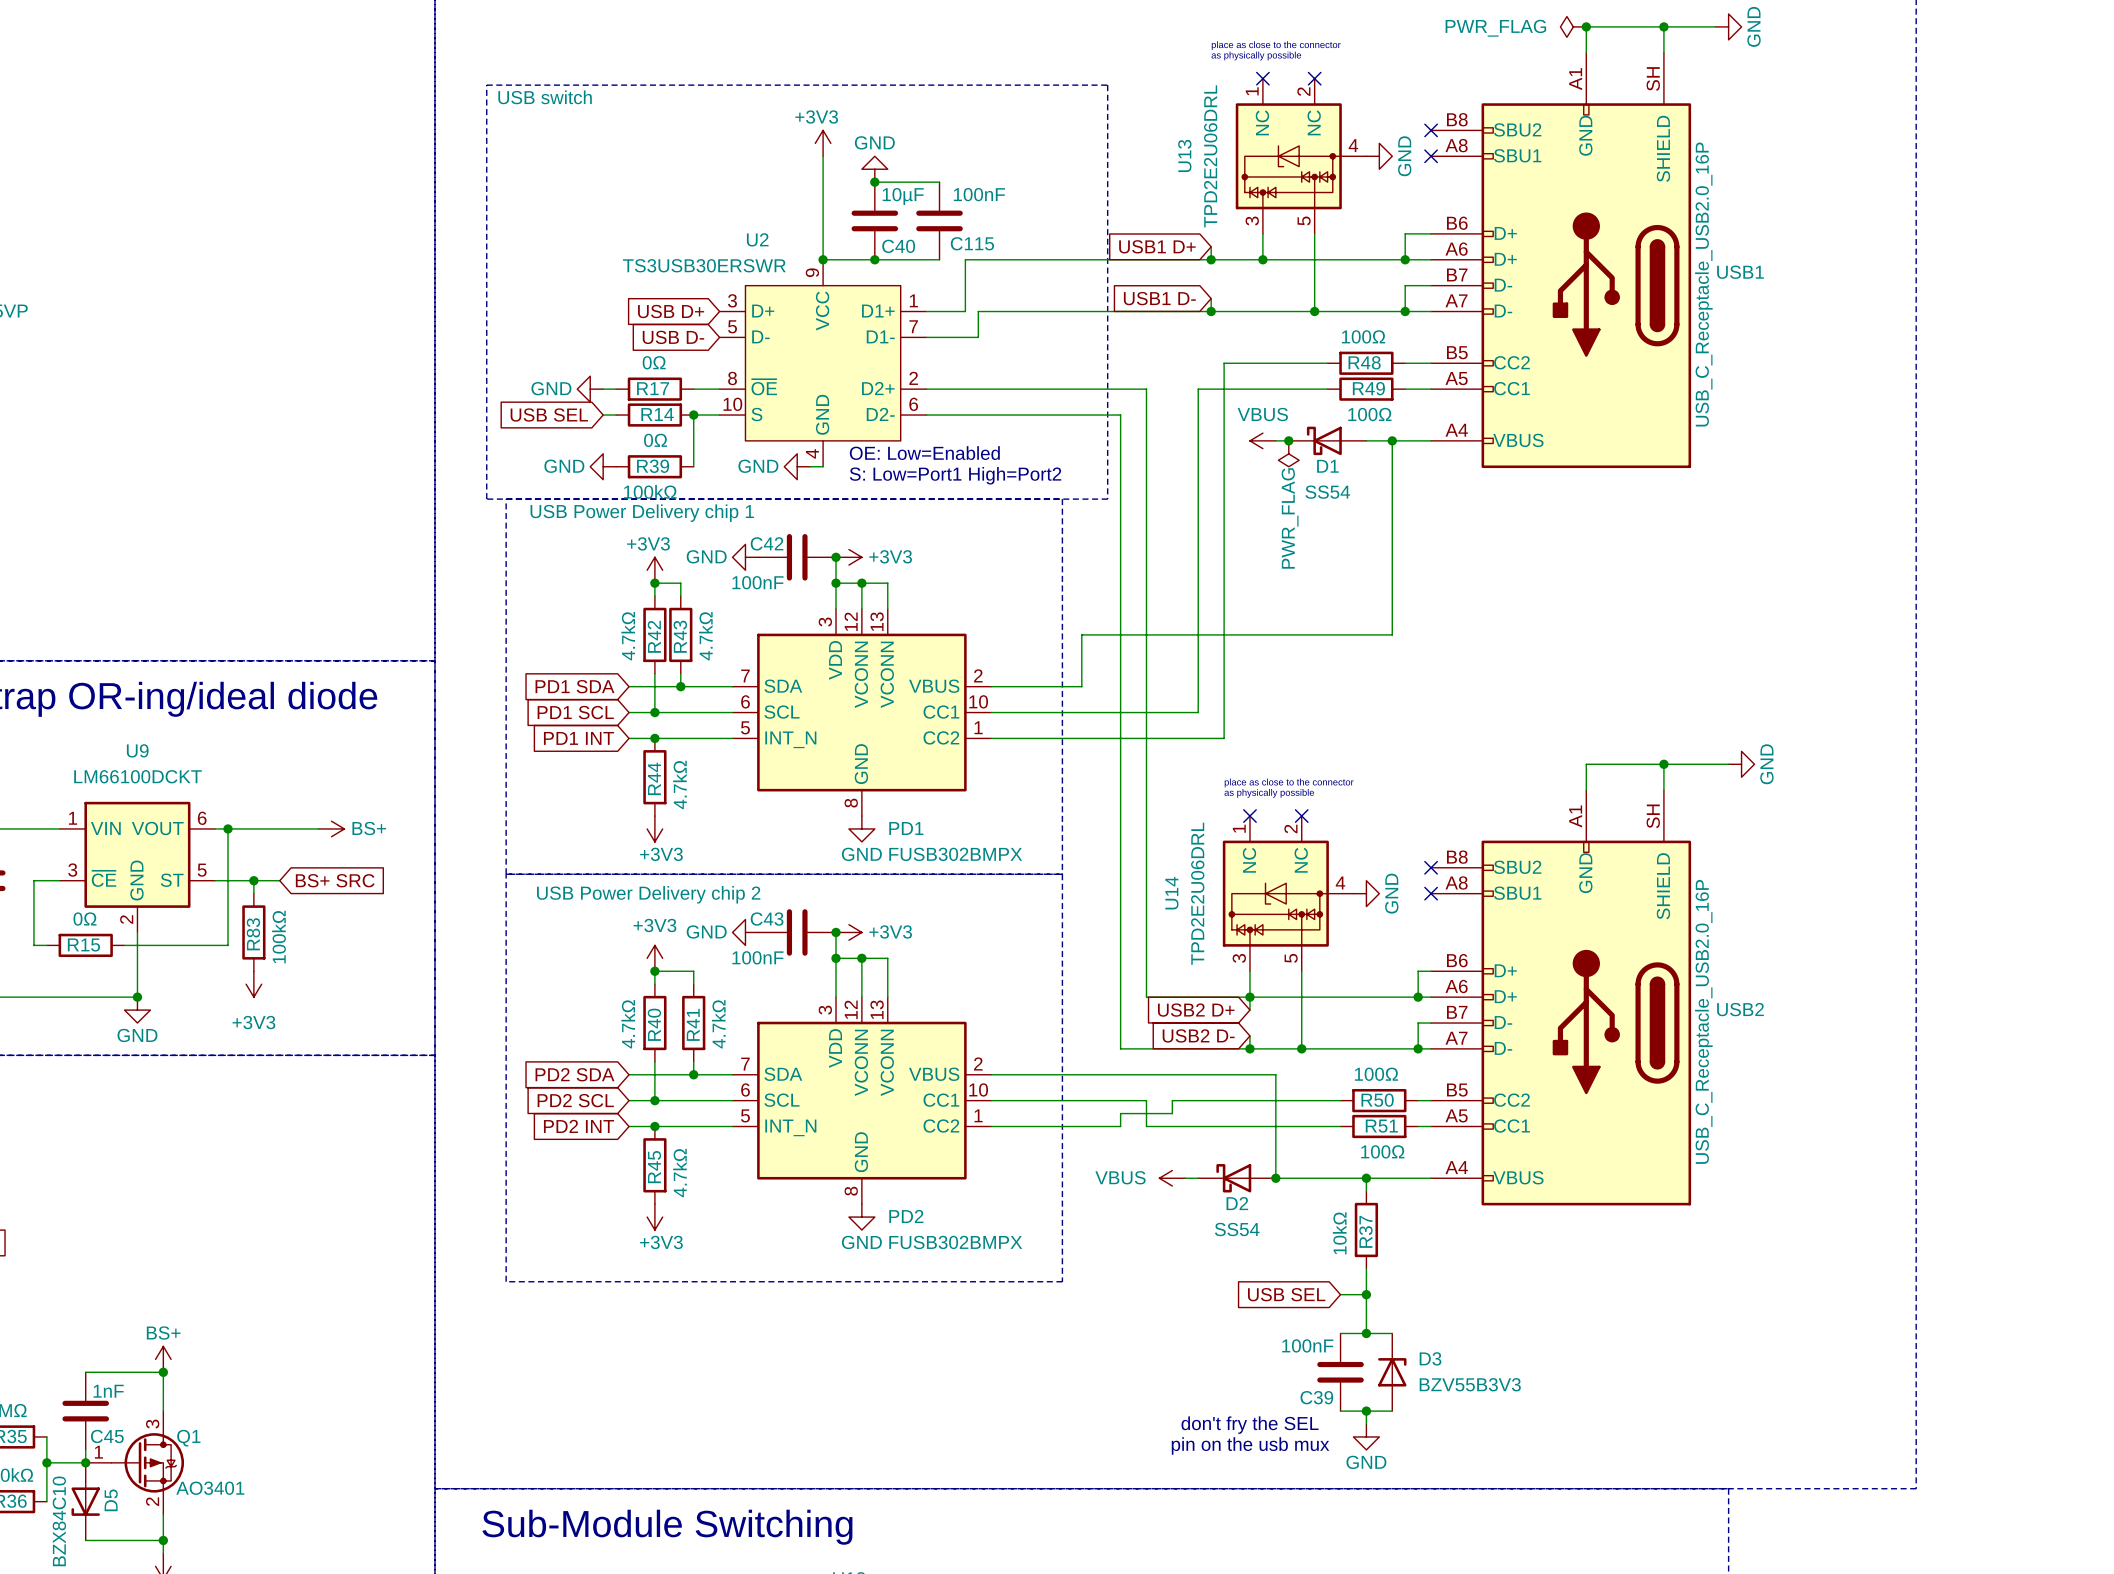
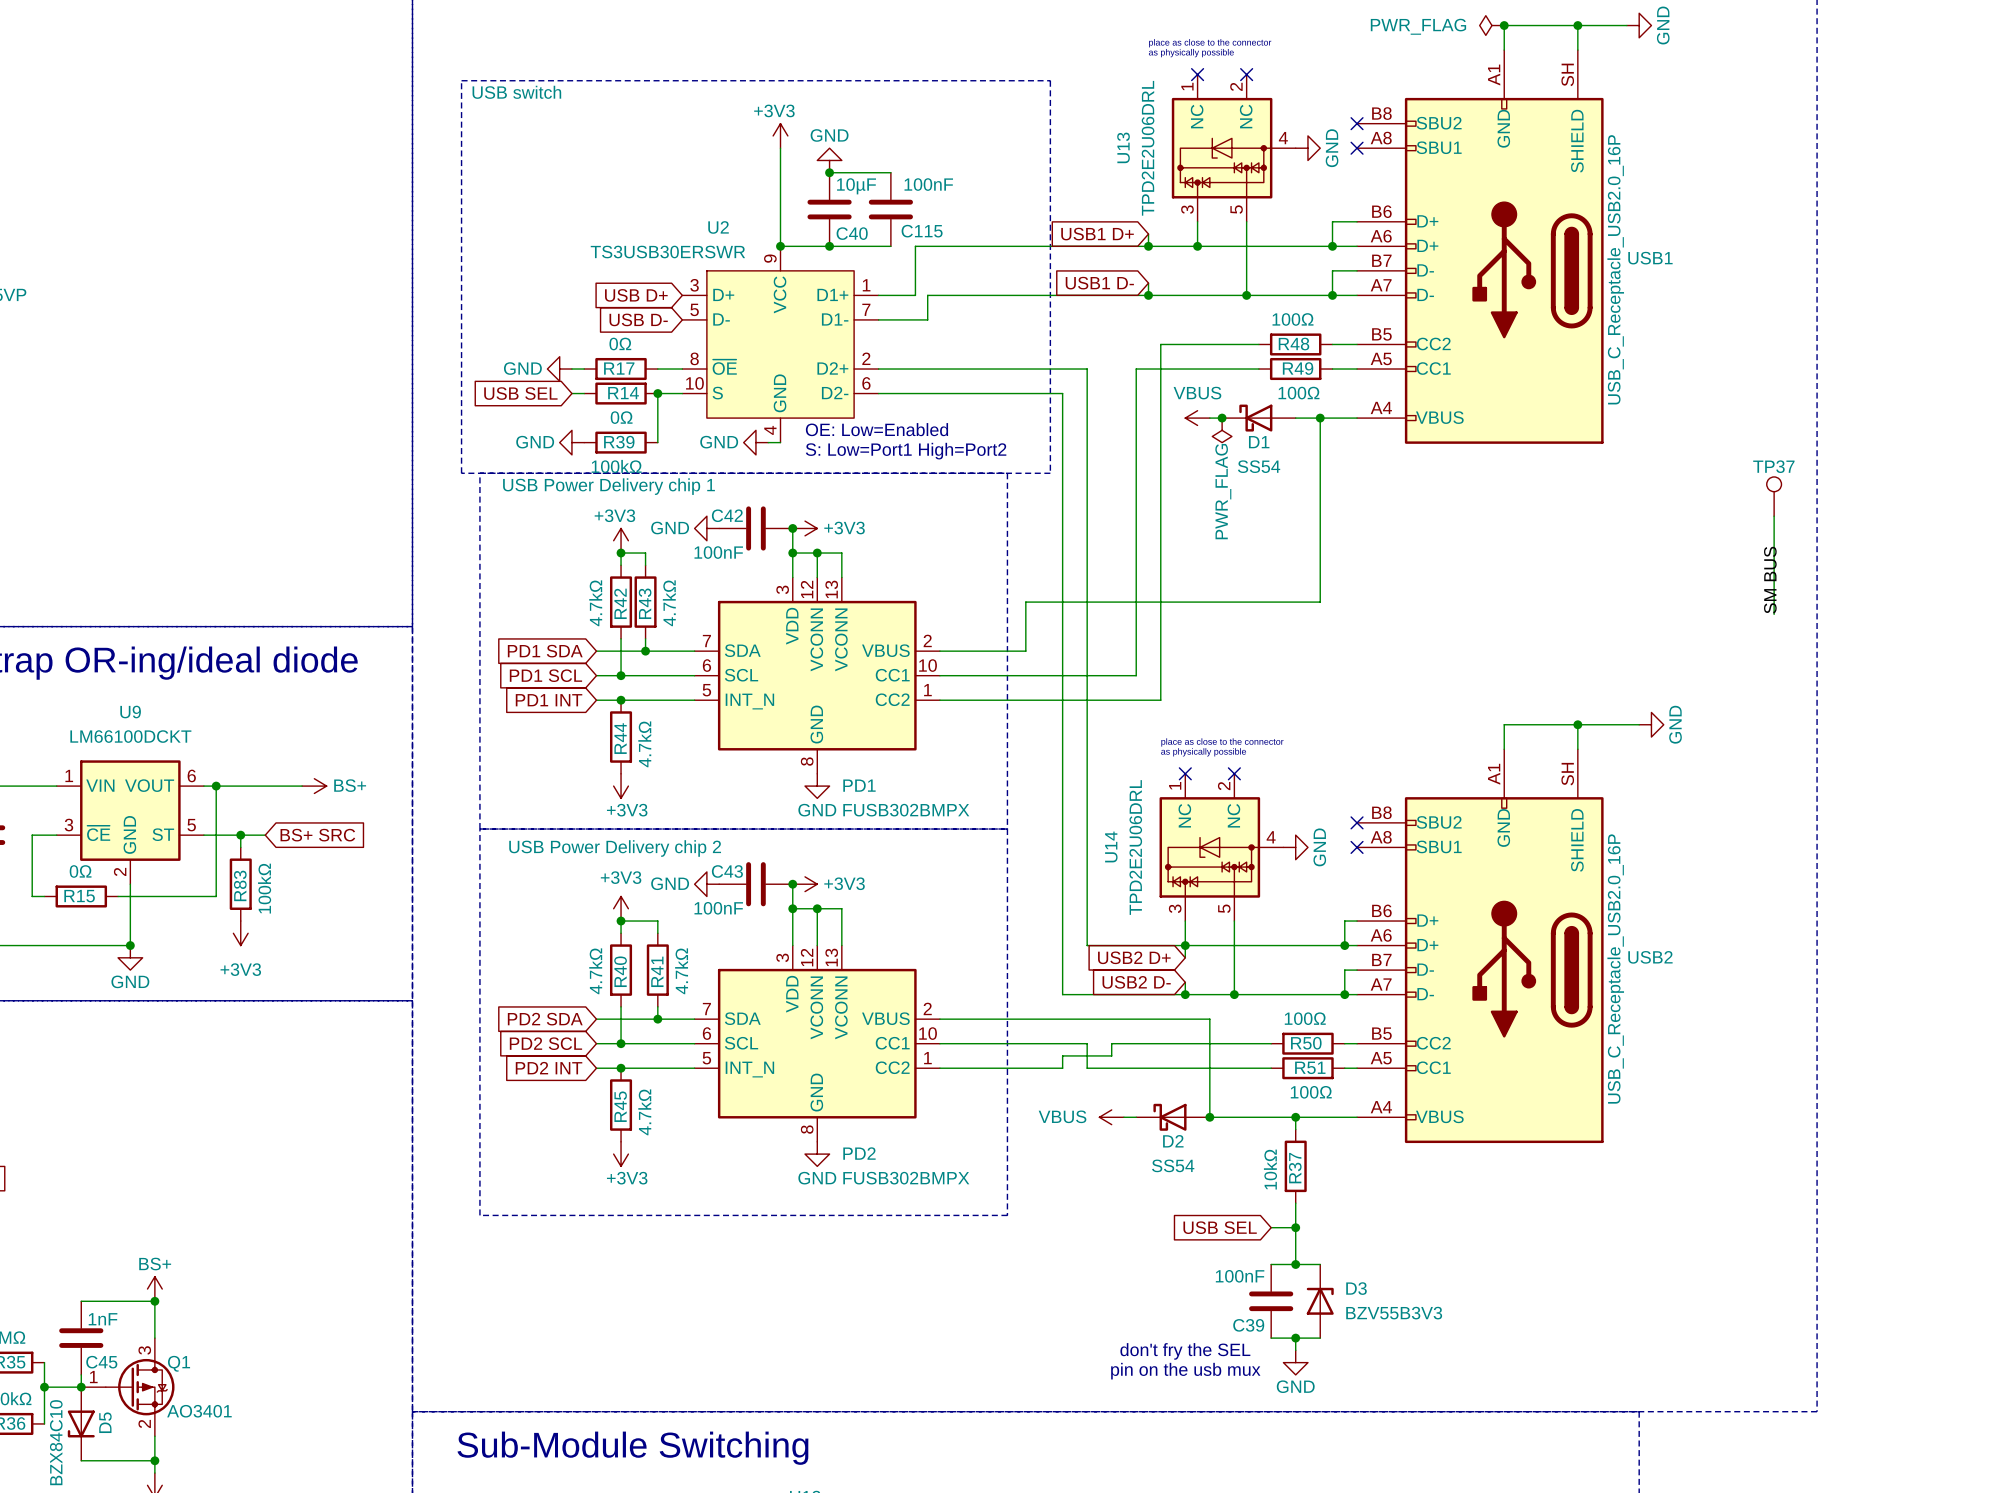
TP37: none -> (1774, 496)
wire: none -> (1774, 516) (1774, 614)
label: none -> SM BUS (1770, 580)

